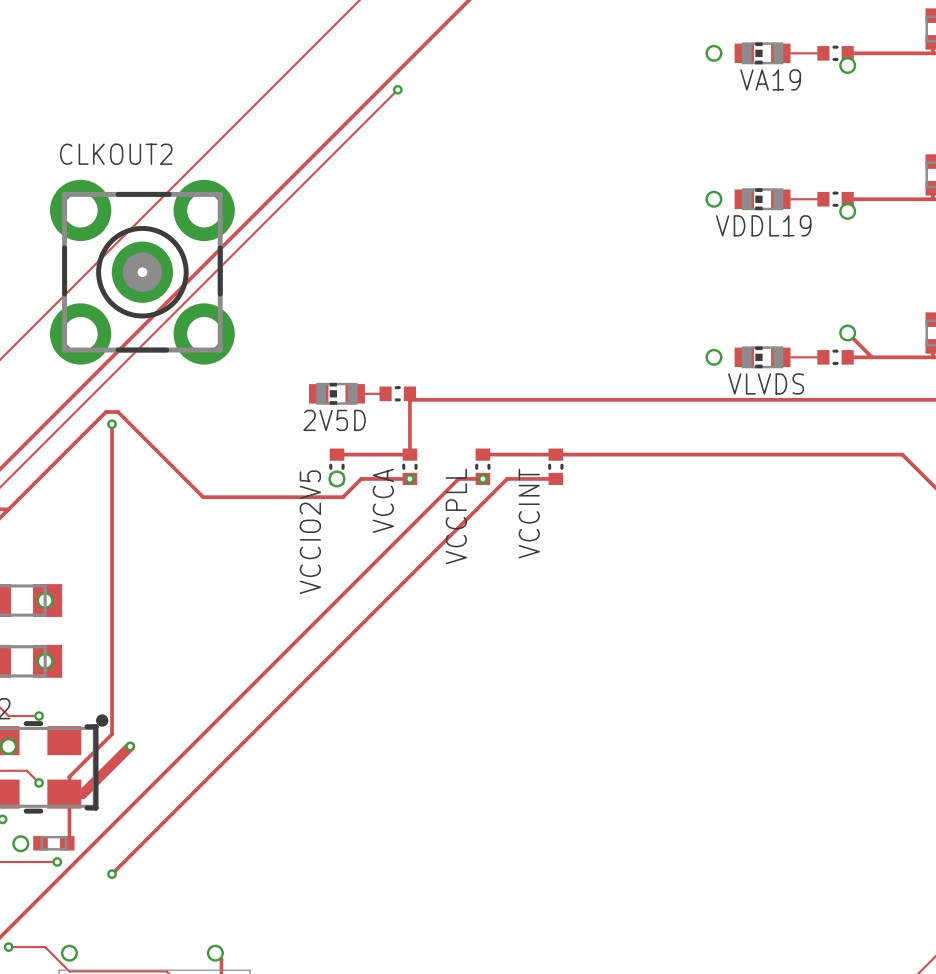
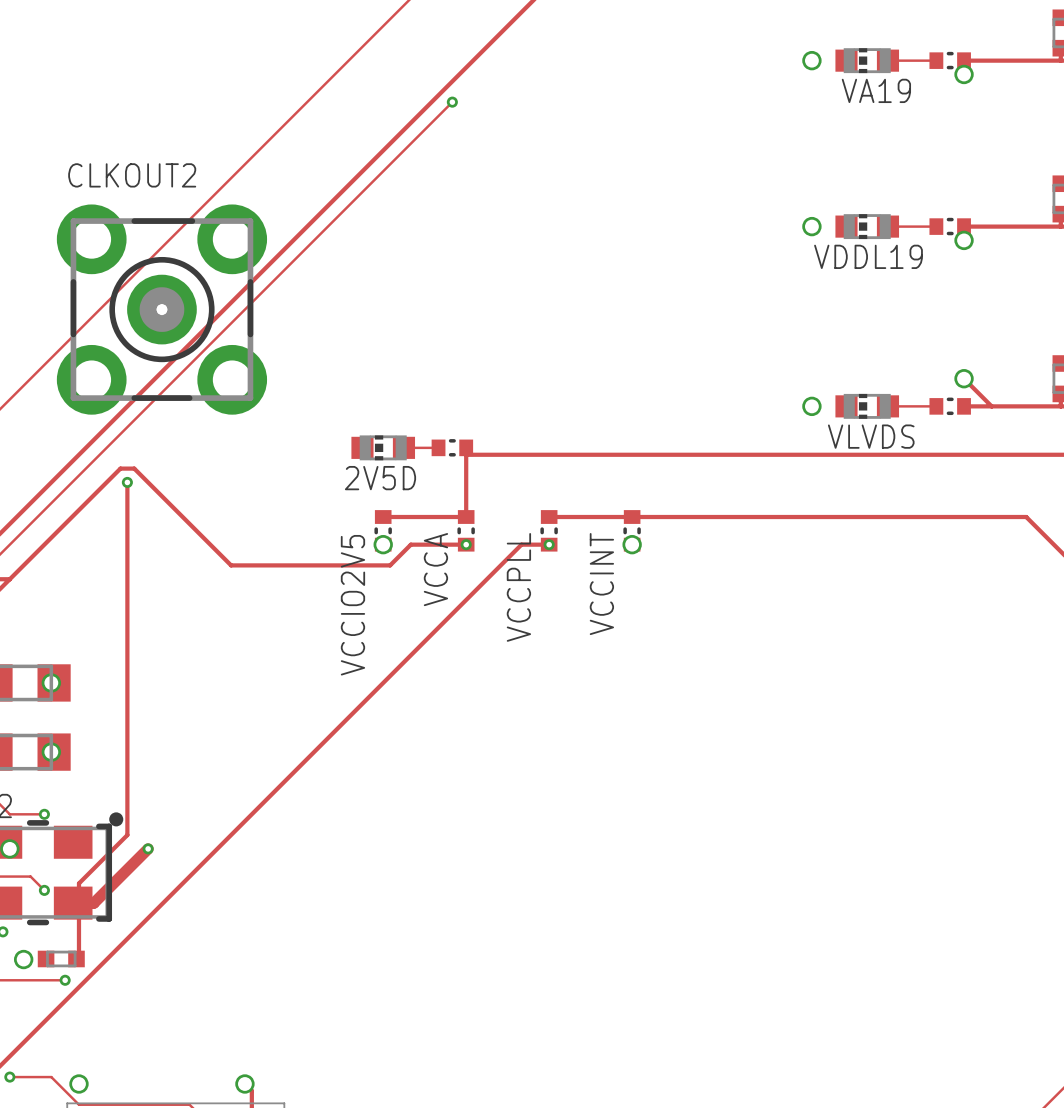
top track: (555, 478) (507, 478) (112, 874) -> none
via: none -> (632, 544)
via: (112, 874) -> none

